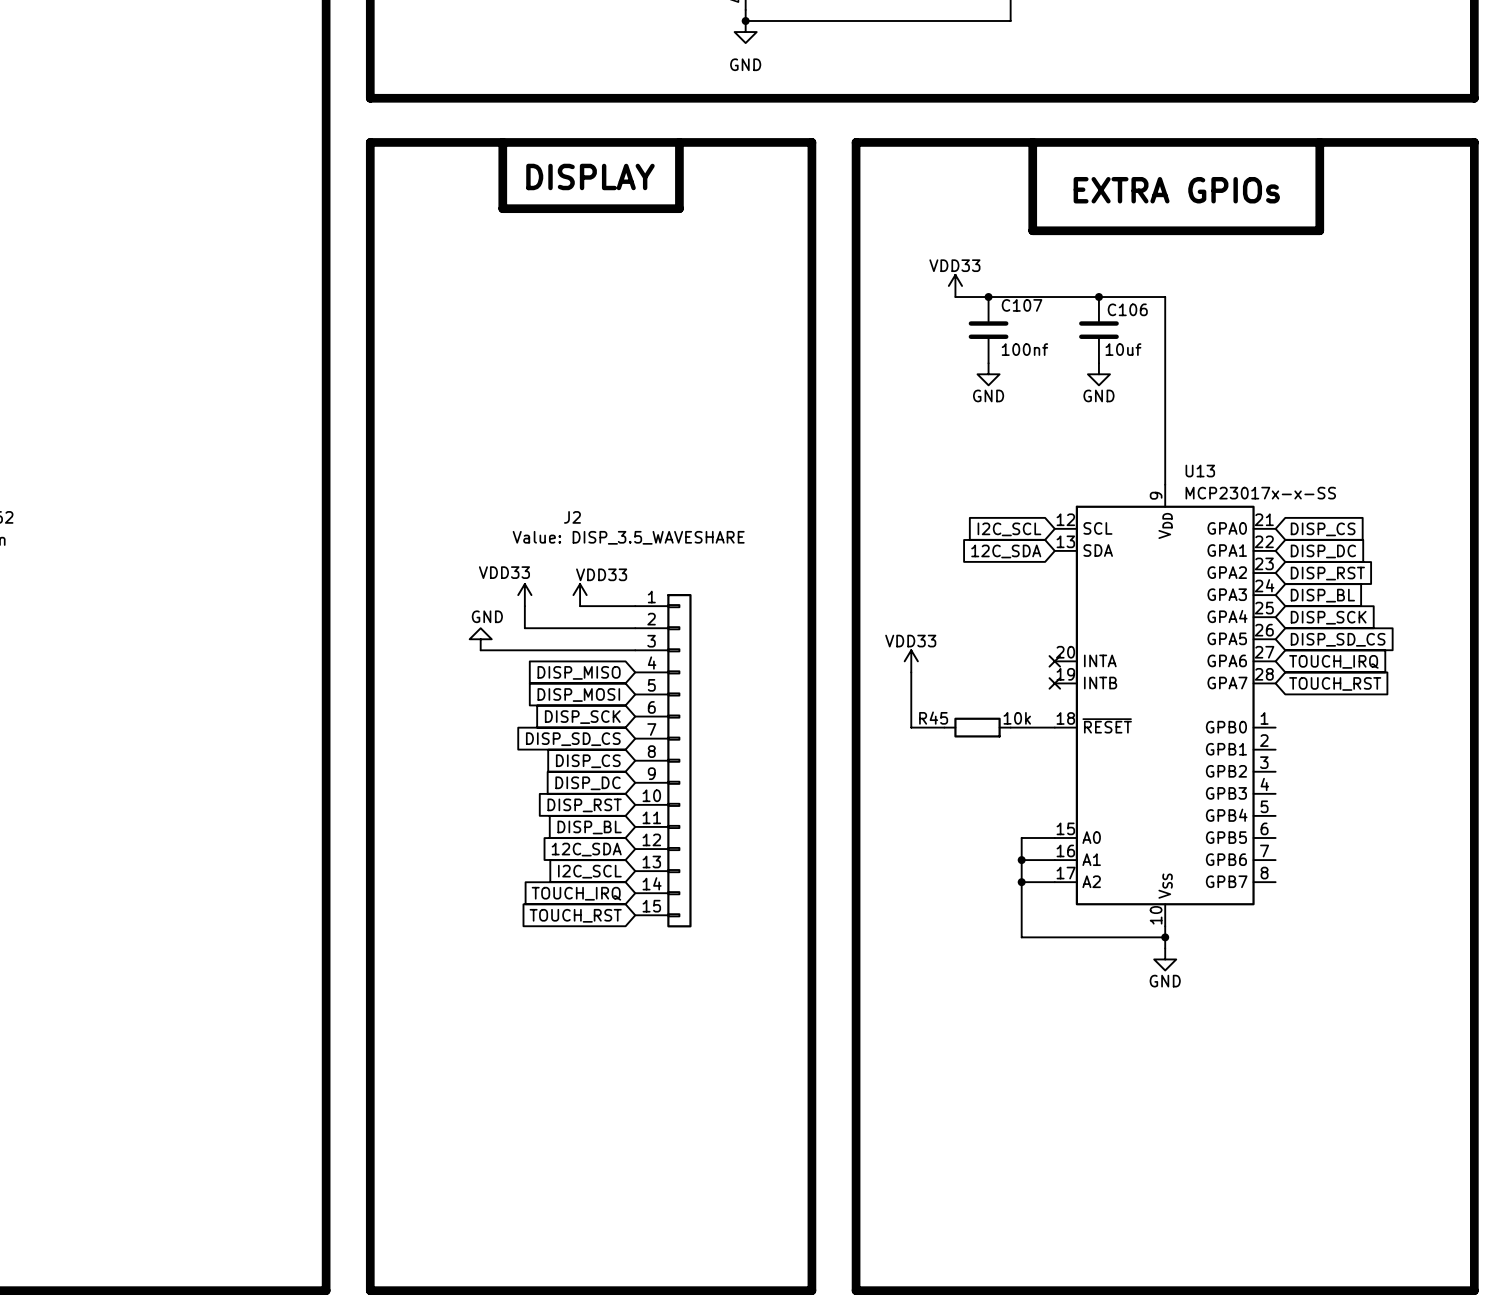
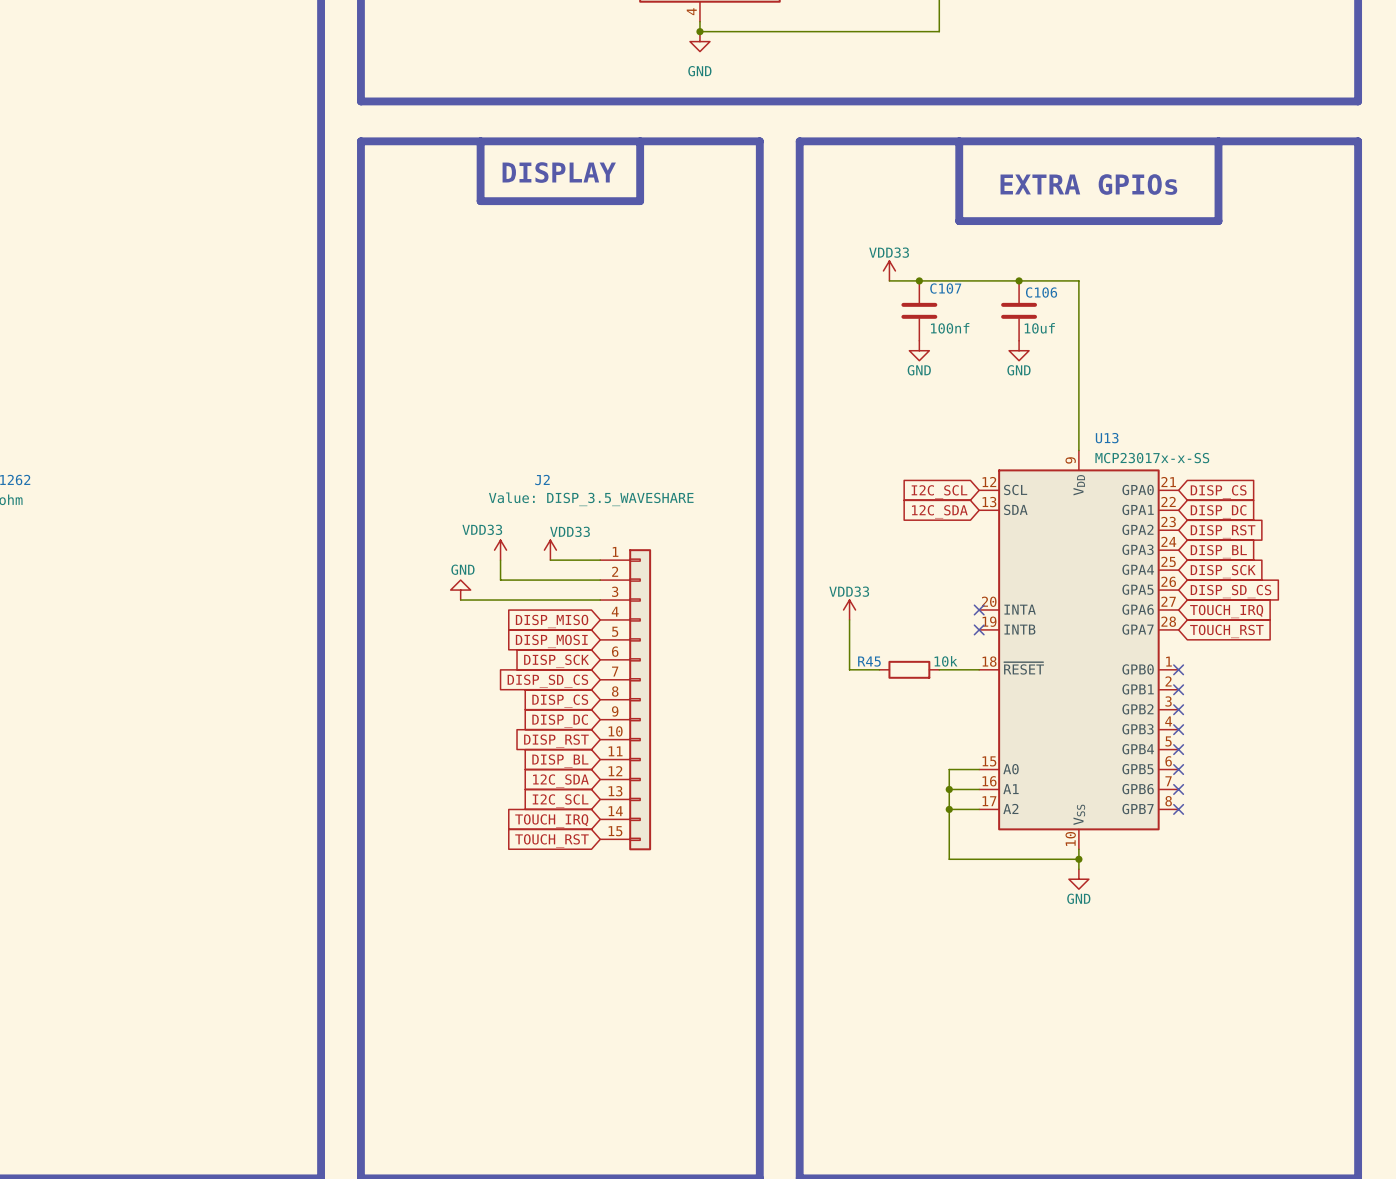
no-connect mark: none -> (1178, 669)
no-connect mark: none -> (1178, 689)
no-connect mark: none -> (1178, 709)
no-connect mark: none -> (1178, 729)
no-connect mark: none -> (1178, 749)
no-connect mark: none -> (1178, 769)
no-connect mark: none -> (1178, 789)
no-connect mark: none -> (1178, 809)

